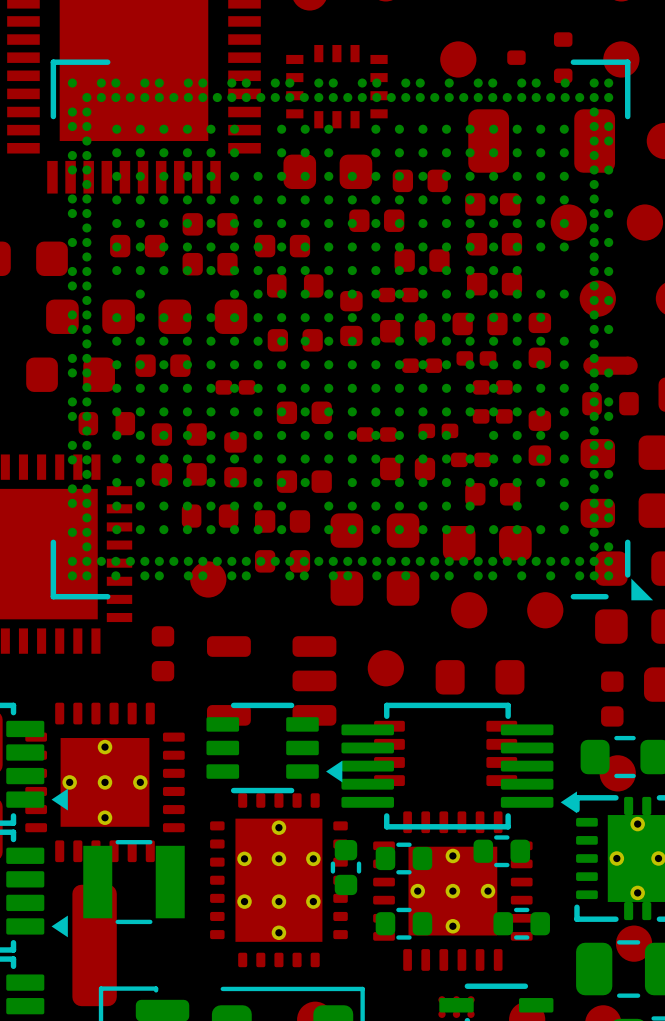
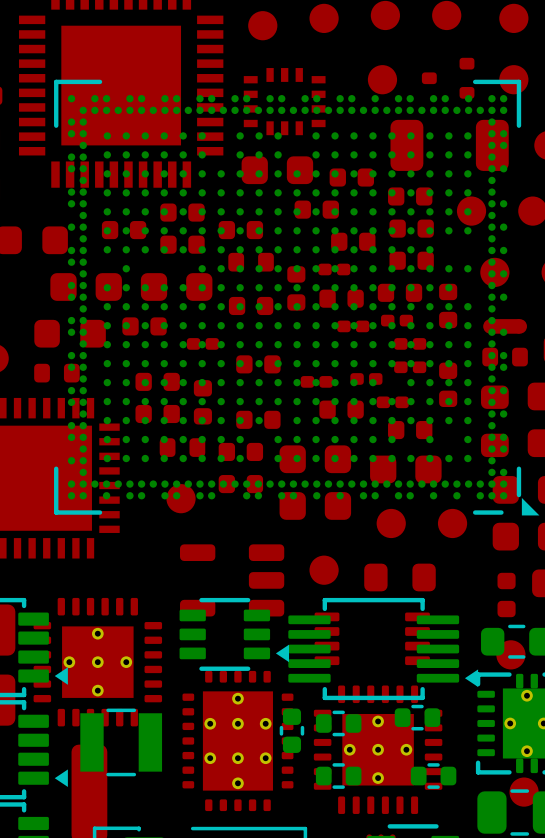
part position: (106, 423) -> (56, 373)
part: (162, 653) -> none

